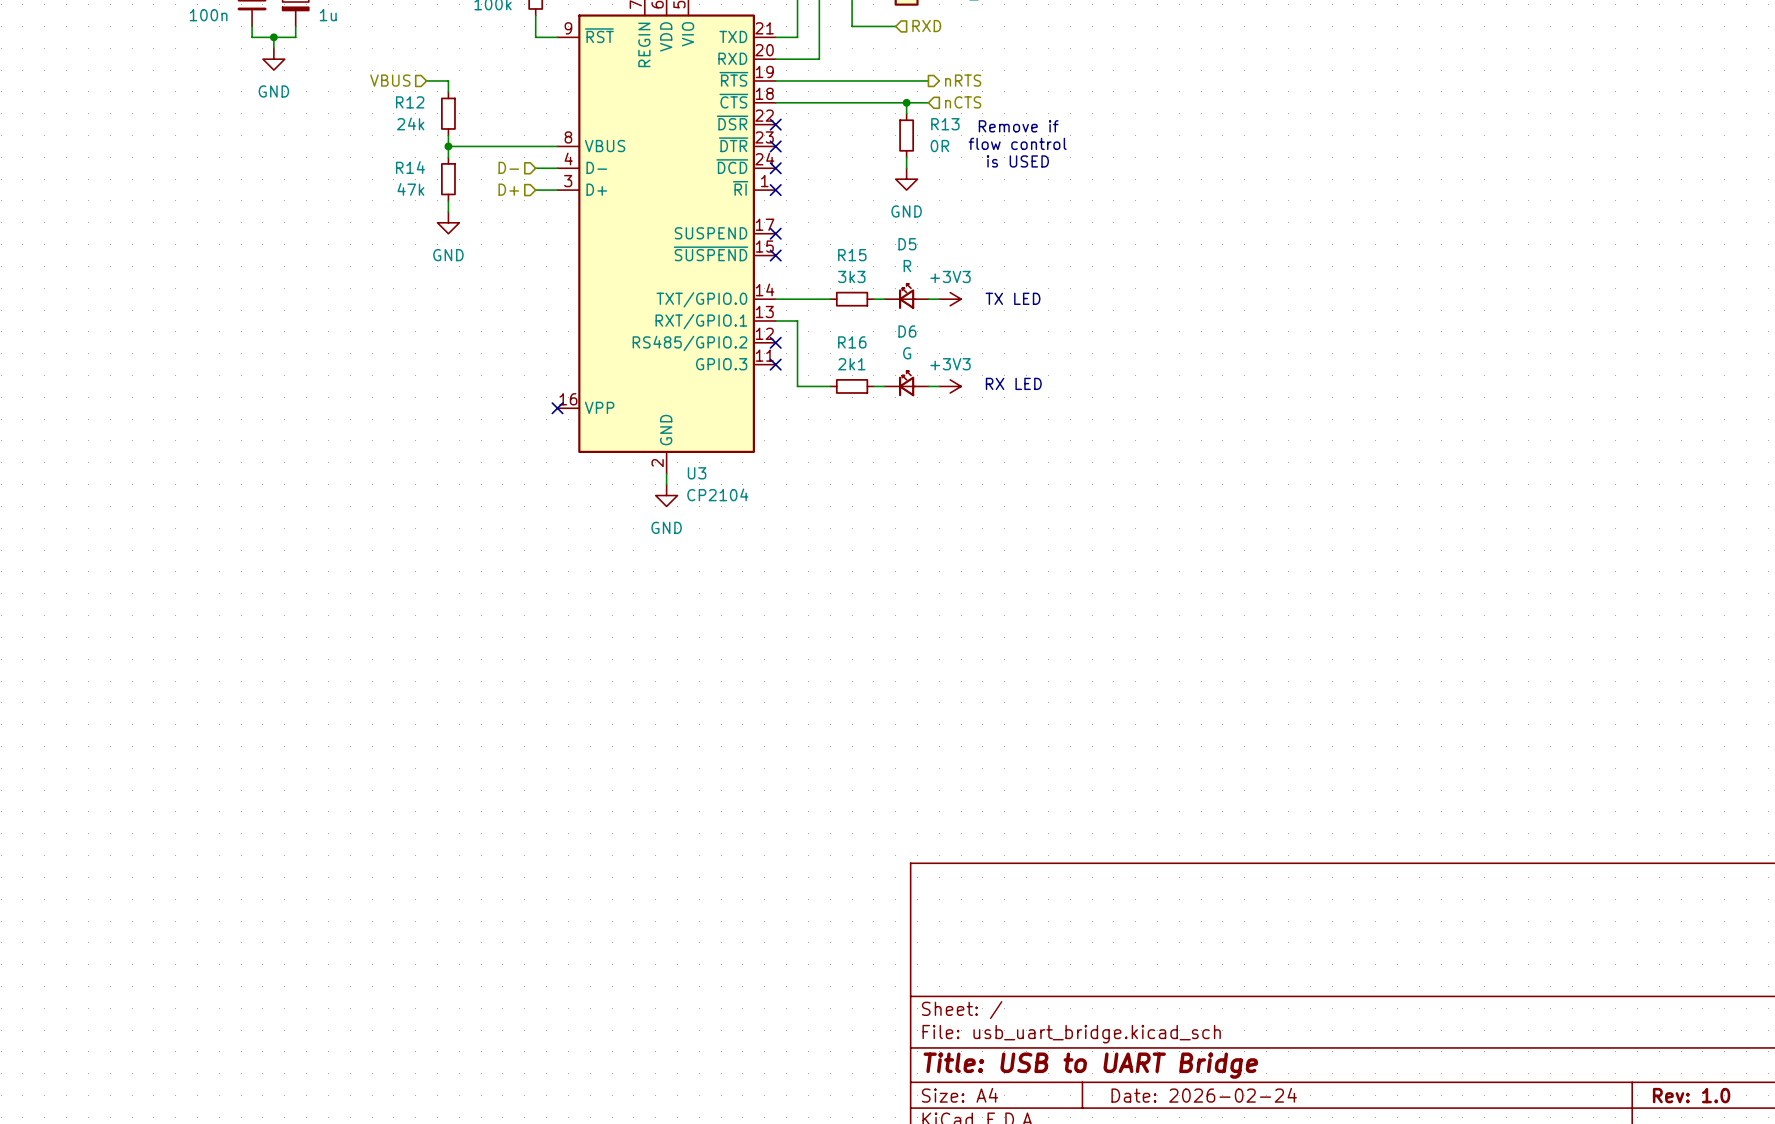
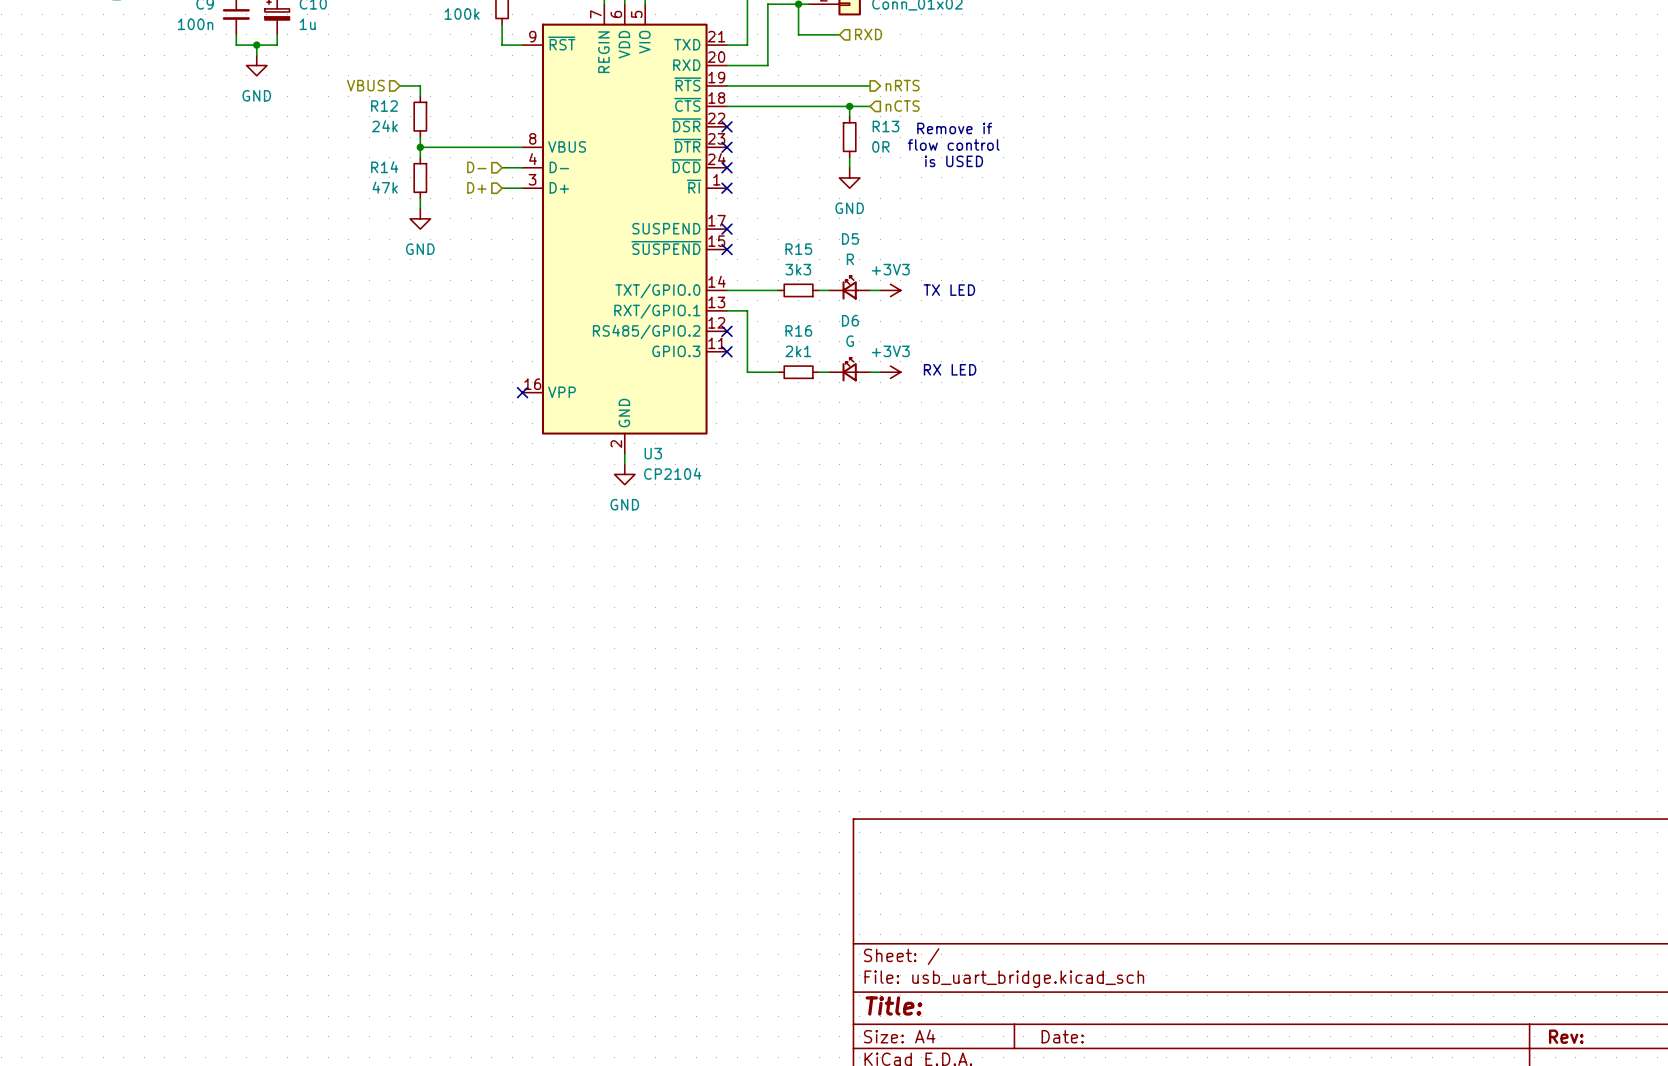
title block: Title: USB to UART Bridge (1090, 1065) -> Title: (893, 1005)
title block: Date: 2026-02-24 (1204, 1095) -> Date: (1062, 1036)
title block: Rev: 1.0 (1691, 1095) -> Rev: (1566, 1036)

